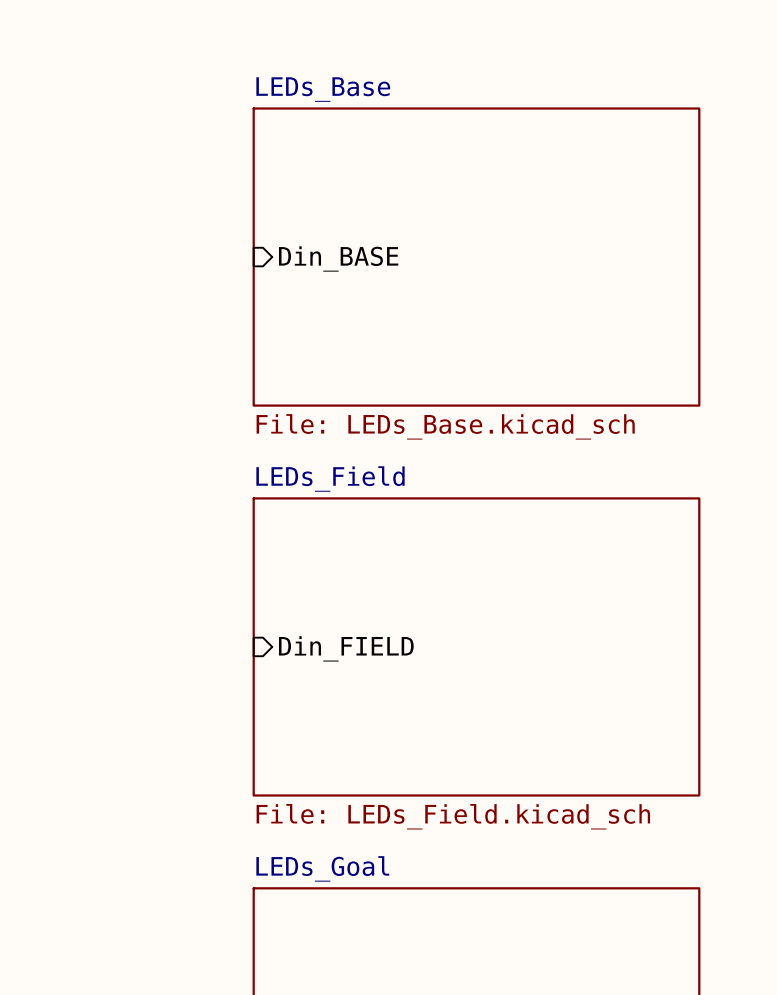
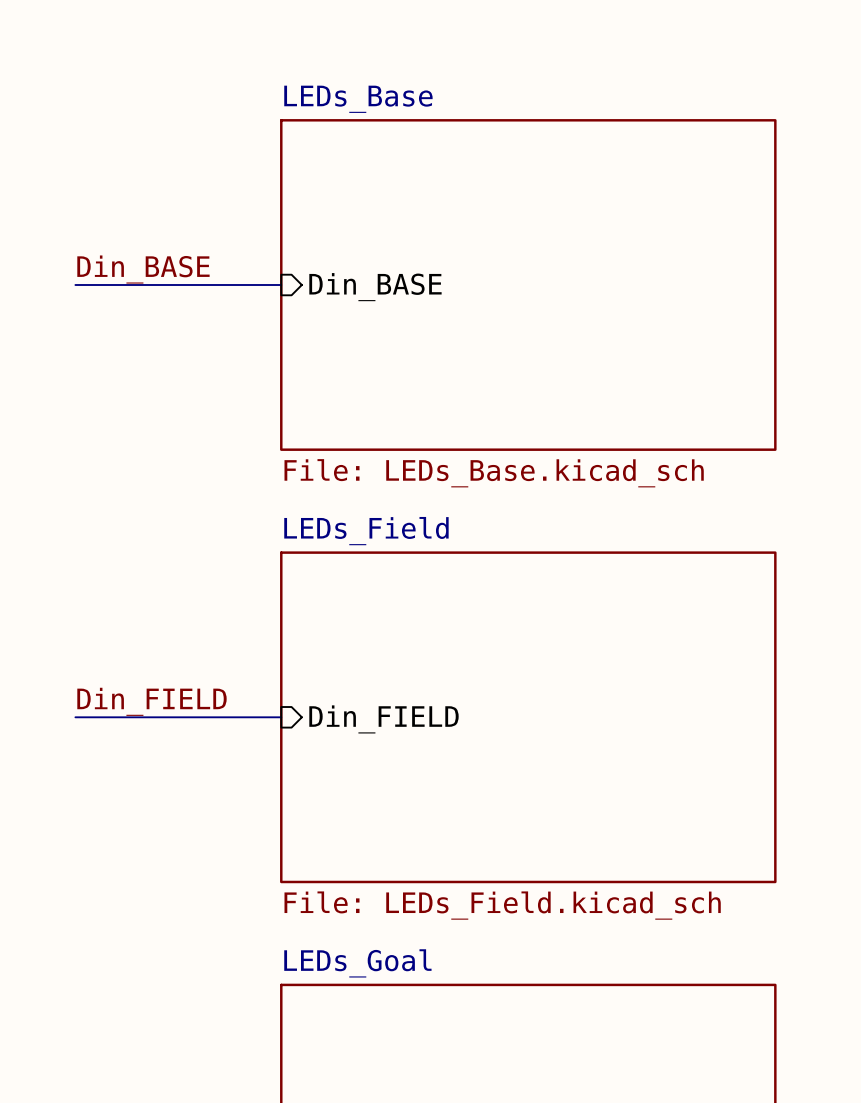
label: none -> Din_BASE (143, 269)
wire: none -> (75, 284) (281, 284)
label: none -> Din_FIELD (151, 701)
wire: none -> (75, 717) (281, 717)

